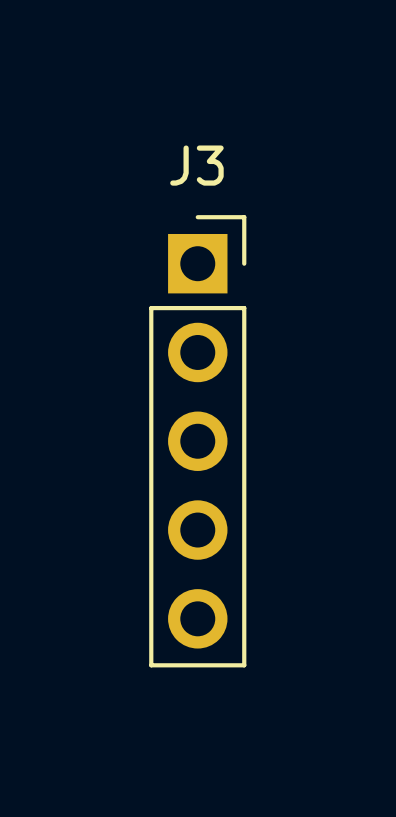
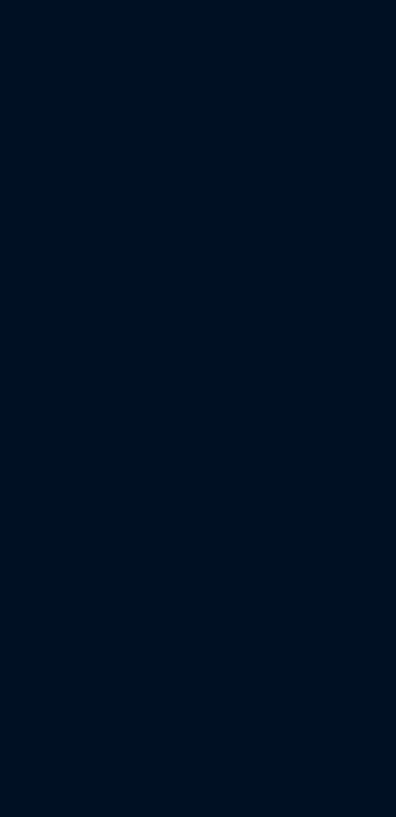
J3: (197, 441) -> none

